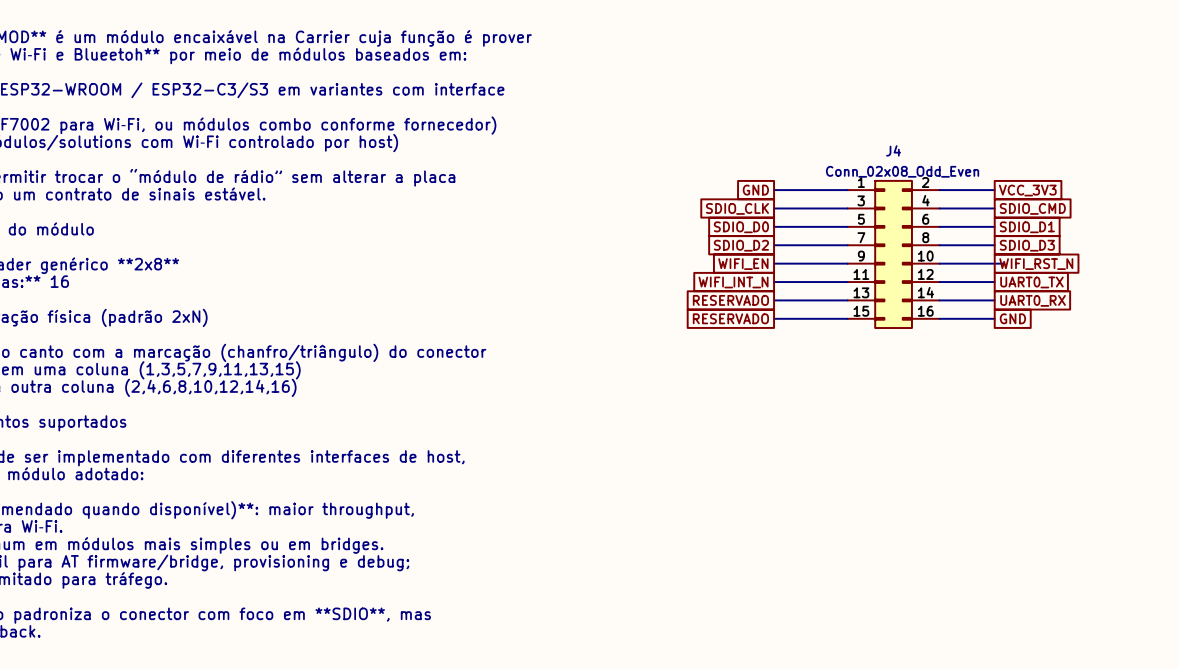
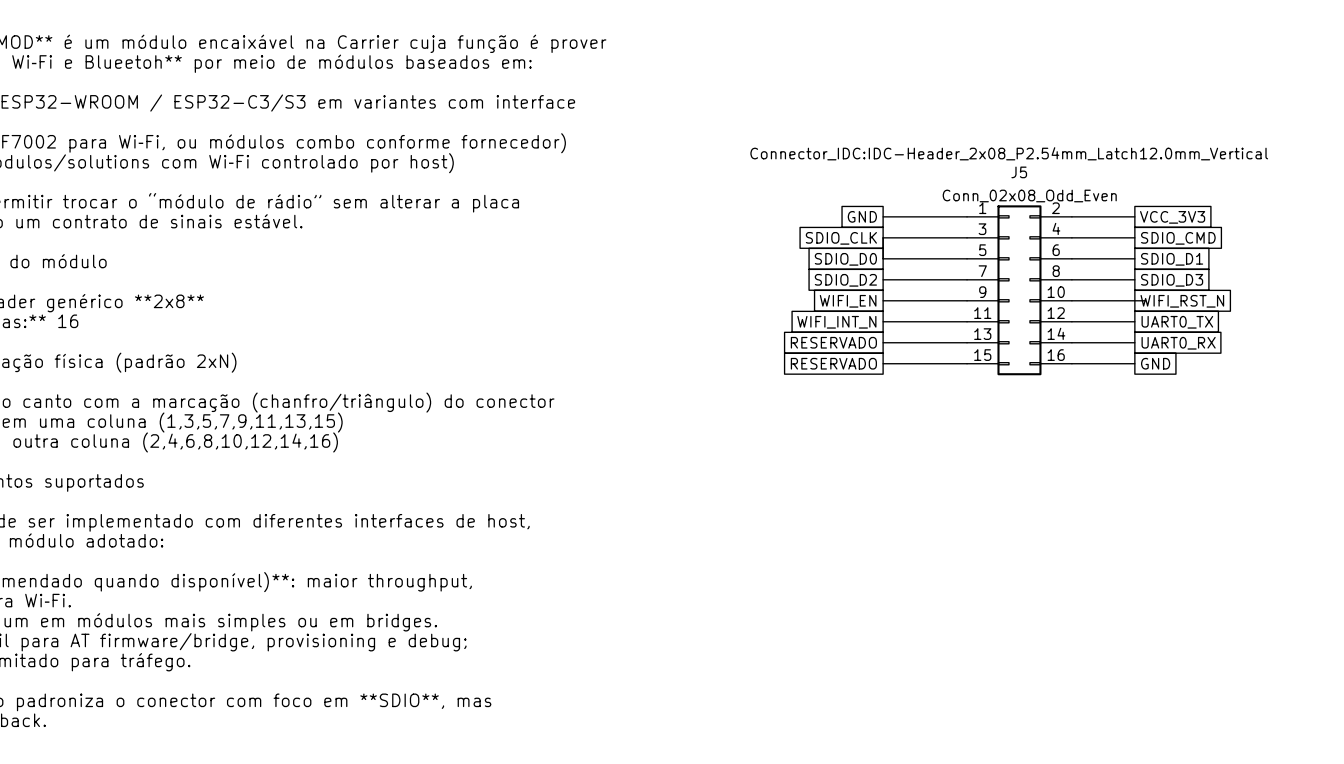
J4 text: none -> Connector_IDC:IDC-Header_2x08_P2.54mm_Latch12.0mm_Vertical (1009, 153)
J4 name: J4 (893, 150) -> J5 (1019, 172)

